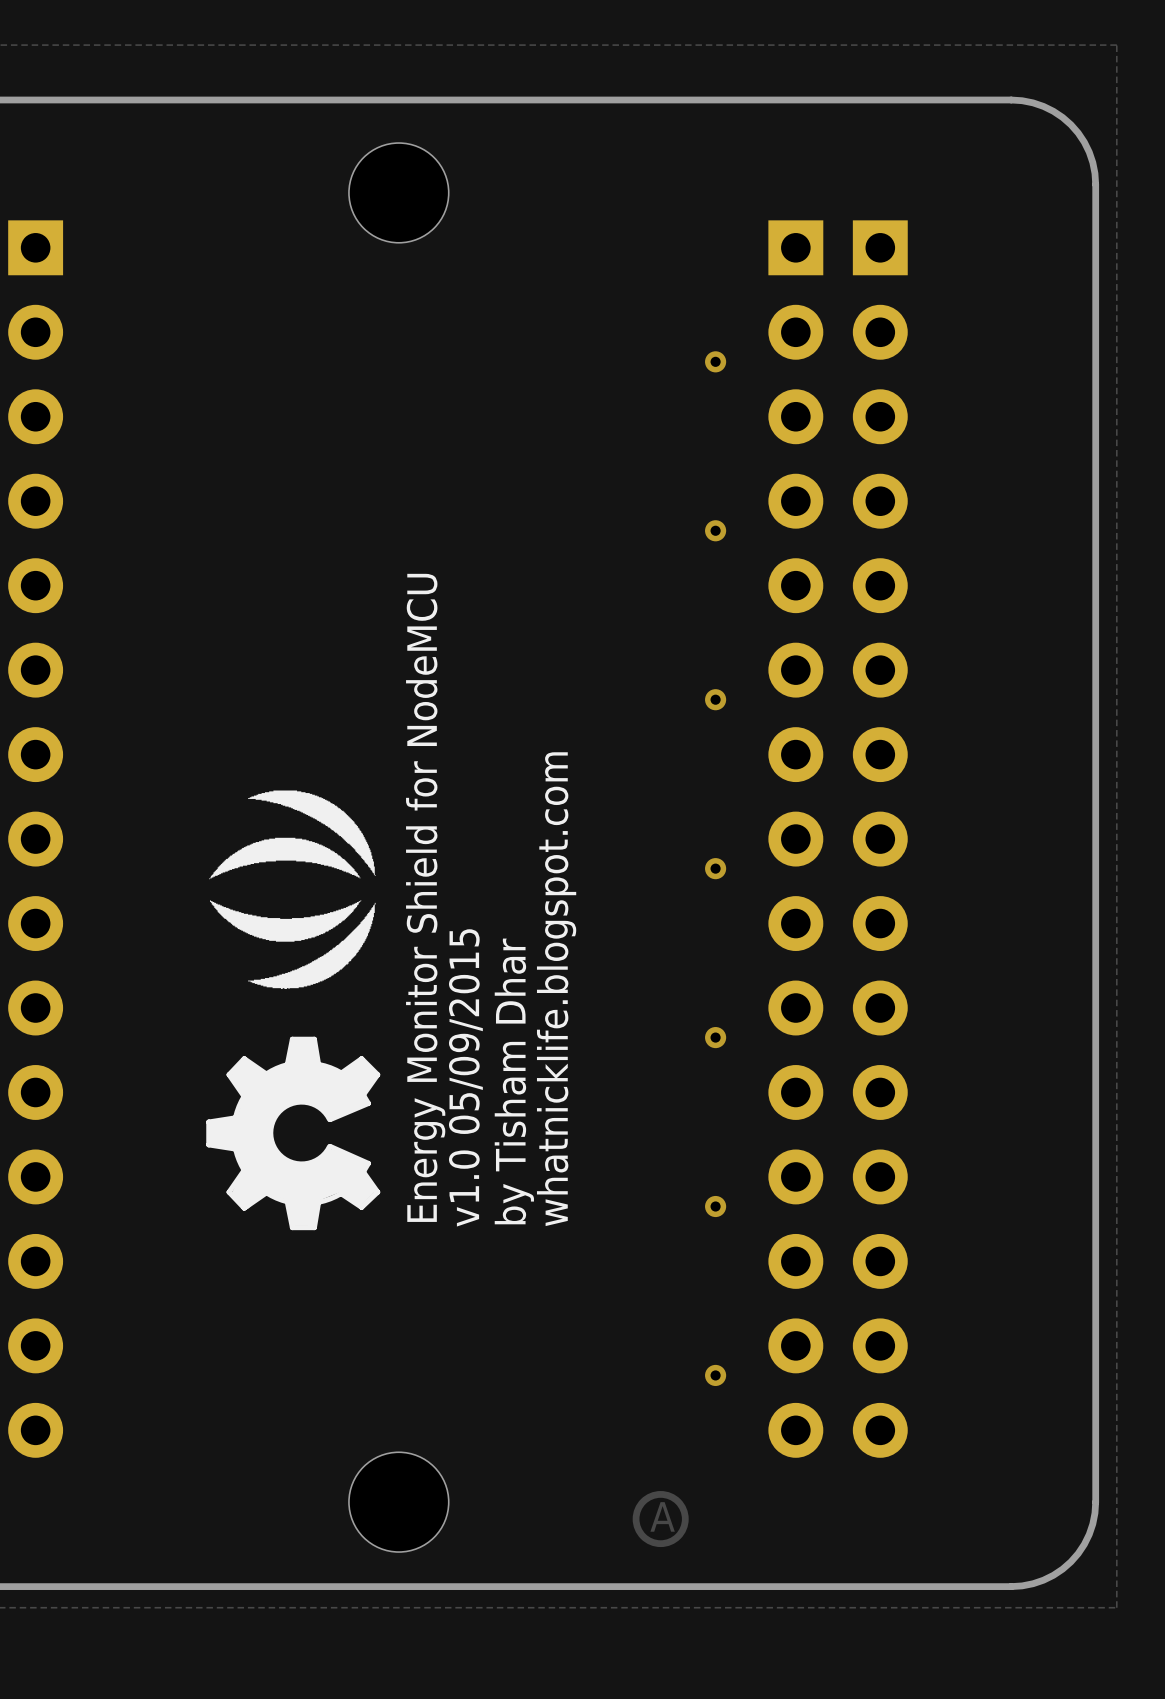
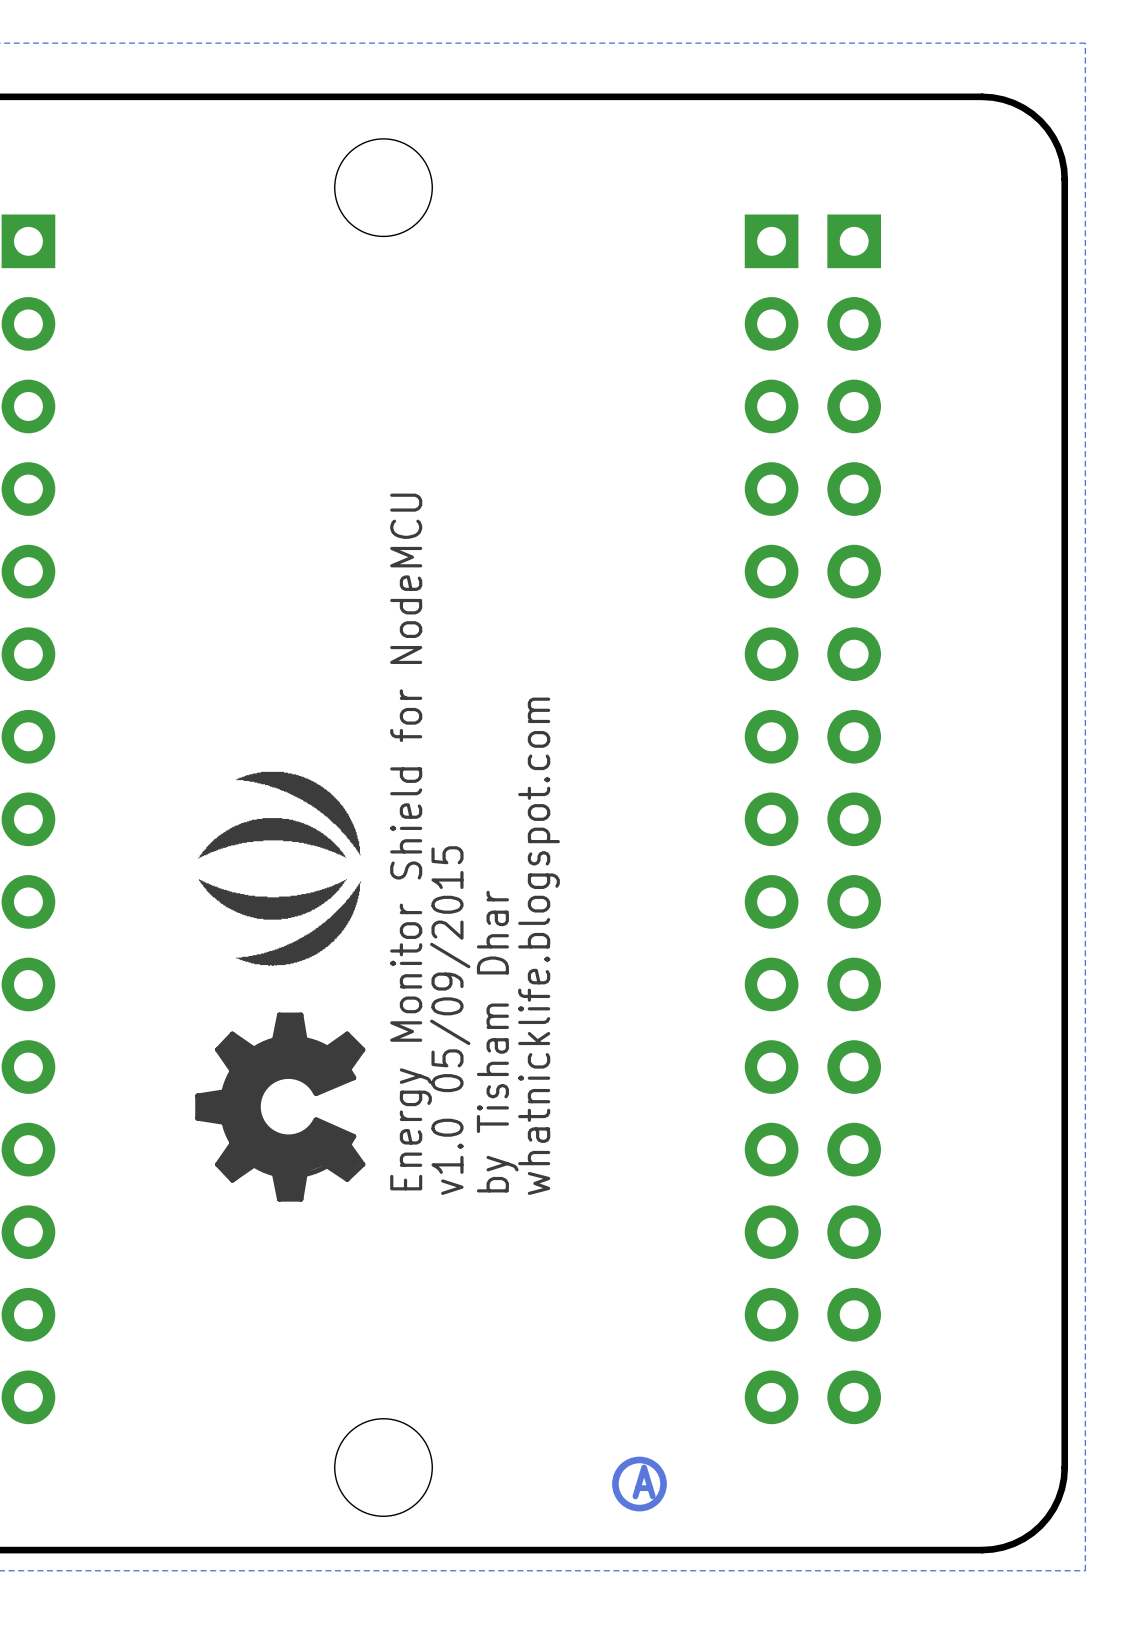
via: (715, 361) -> none
via: (715, 530) -> none
via: (715, 699) -> none
via: (715, 868) -> none
via: (715, 1037) -> none
via: (715, 1206) -> none
via: (715, 1375) -> none

